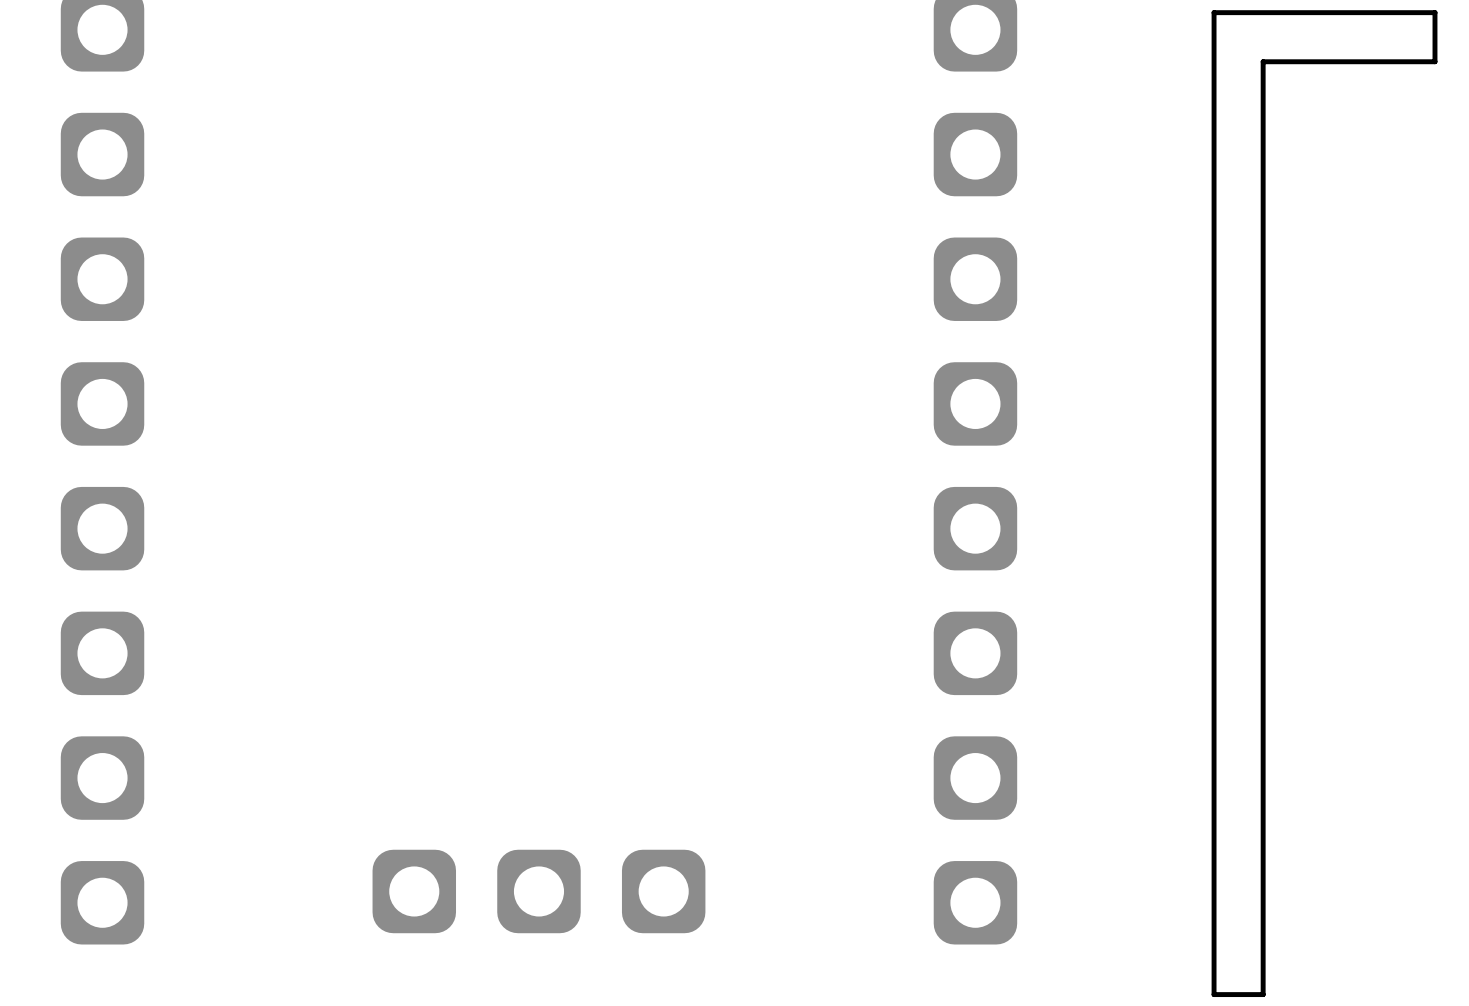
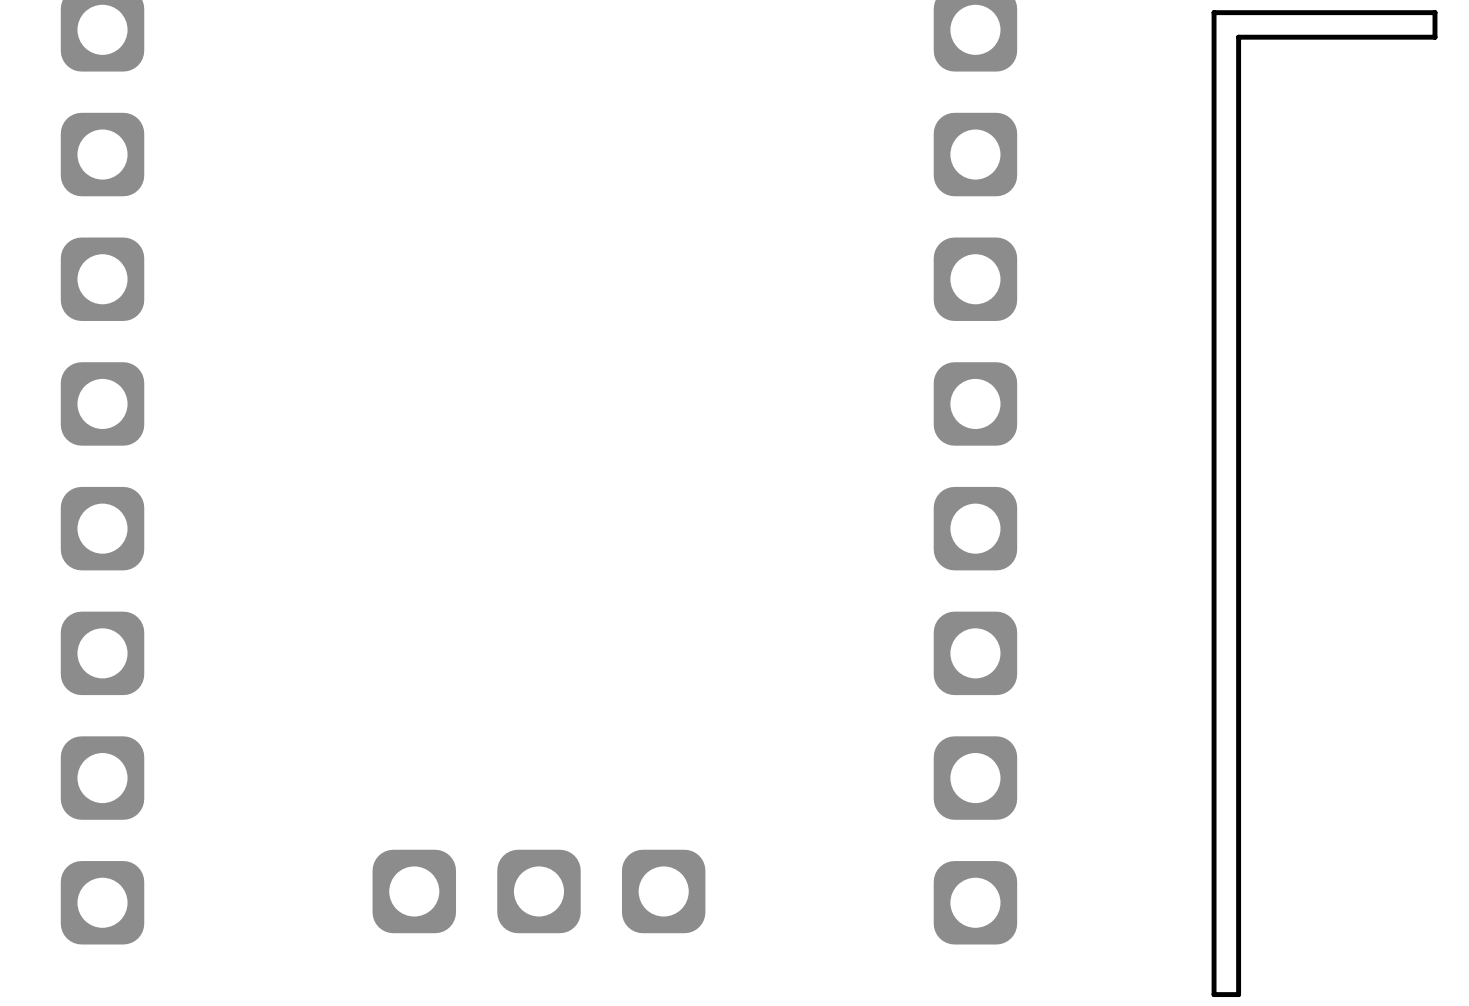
board edge: (1434, 37) (1434, 61) (1263, 61) (1263, 994) (1238, 994) -> (1434, 37) (1238, 37) (1238, 994)

